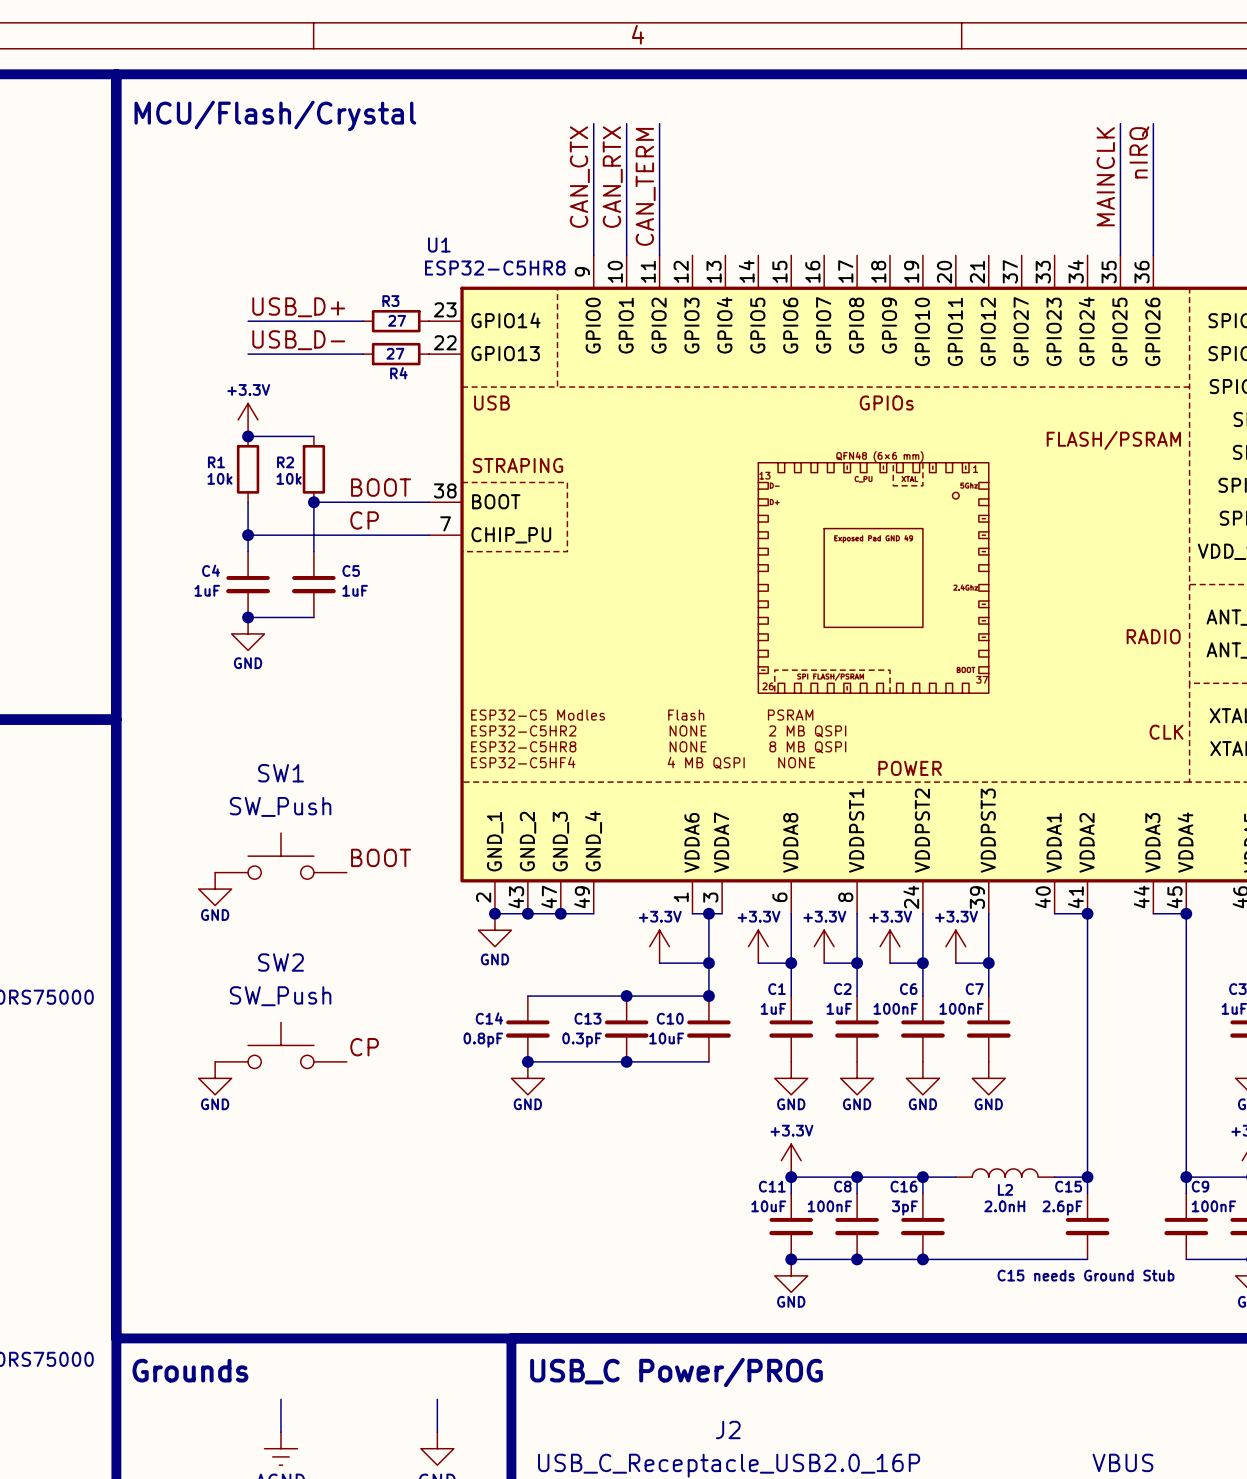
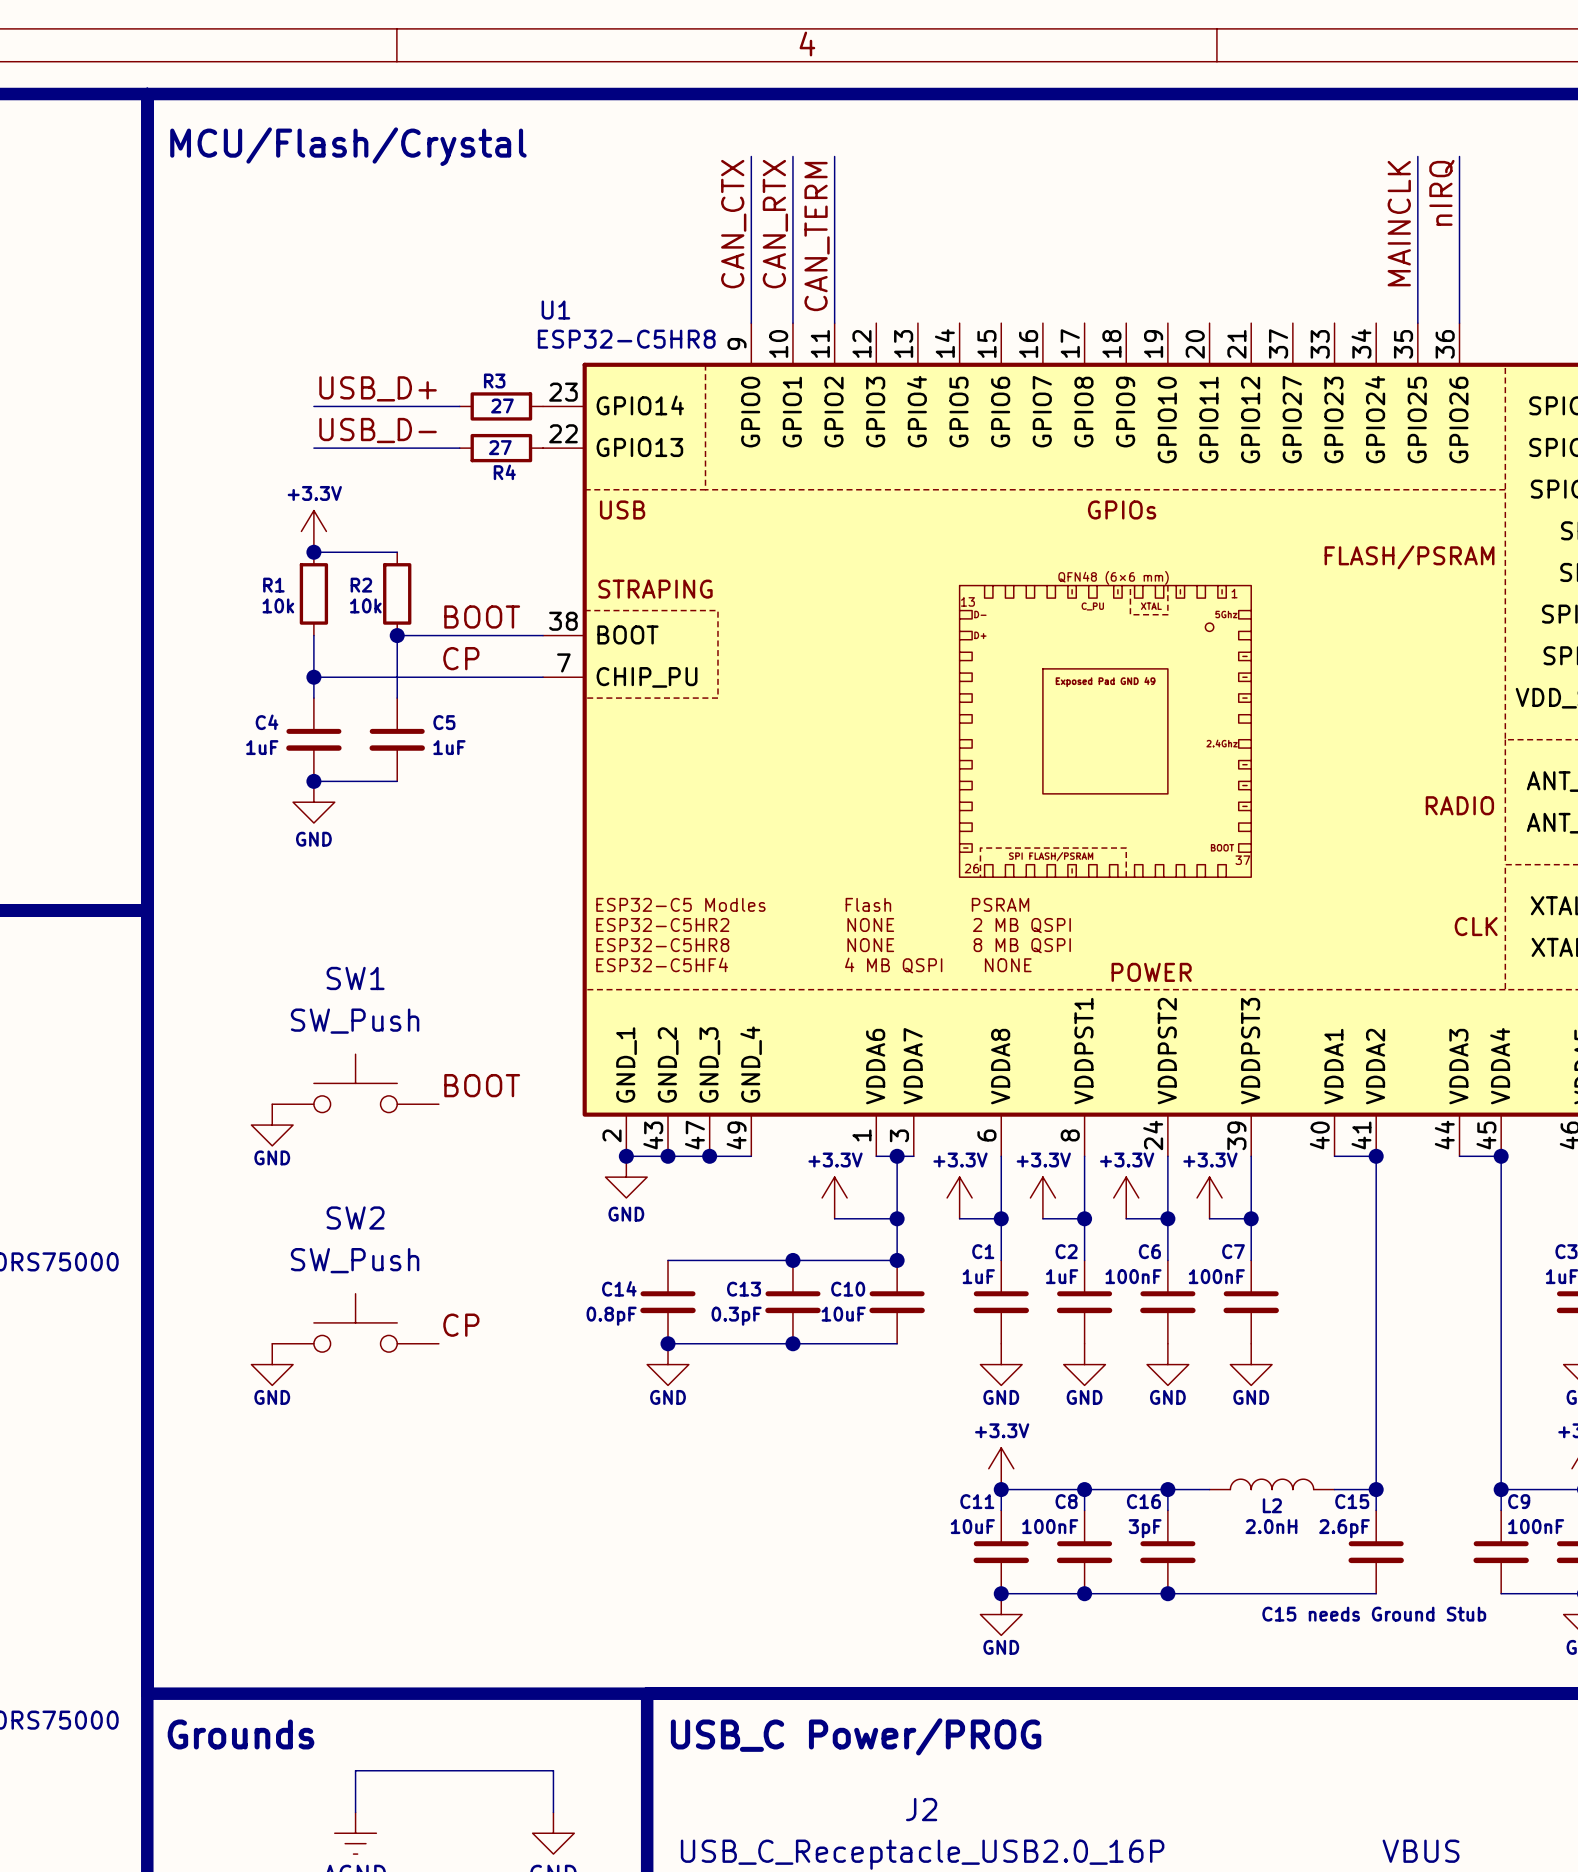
wire: none -> (355, 1770) (553, 1770)

